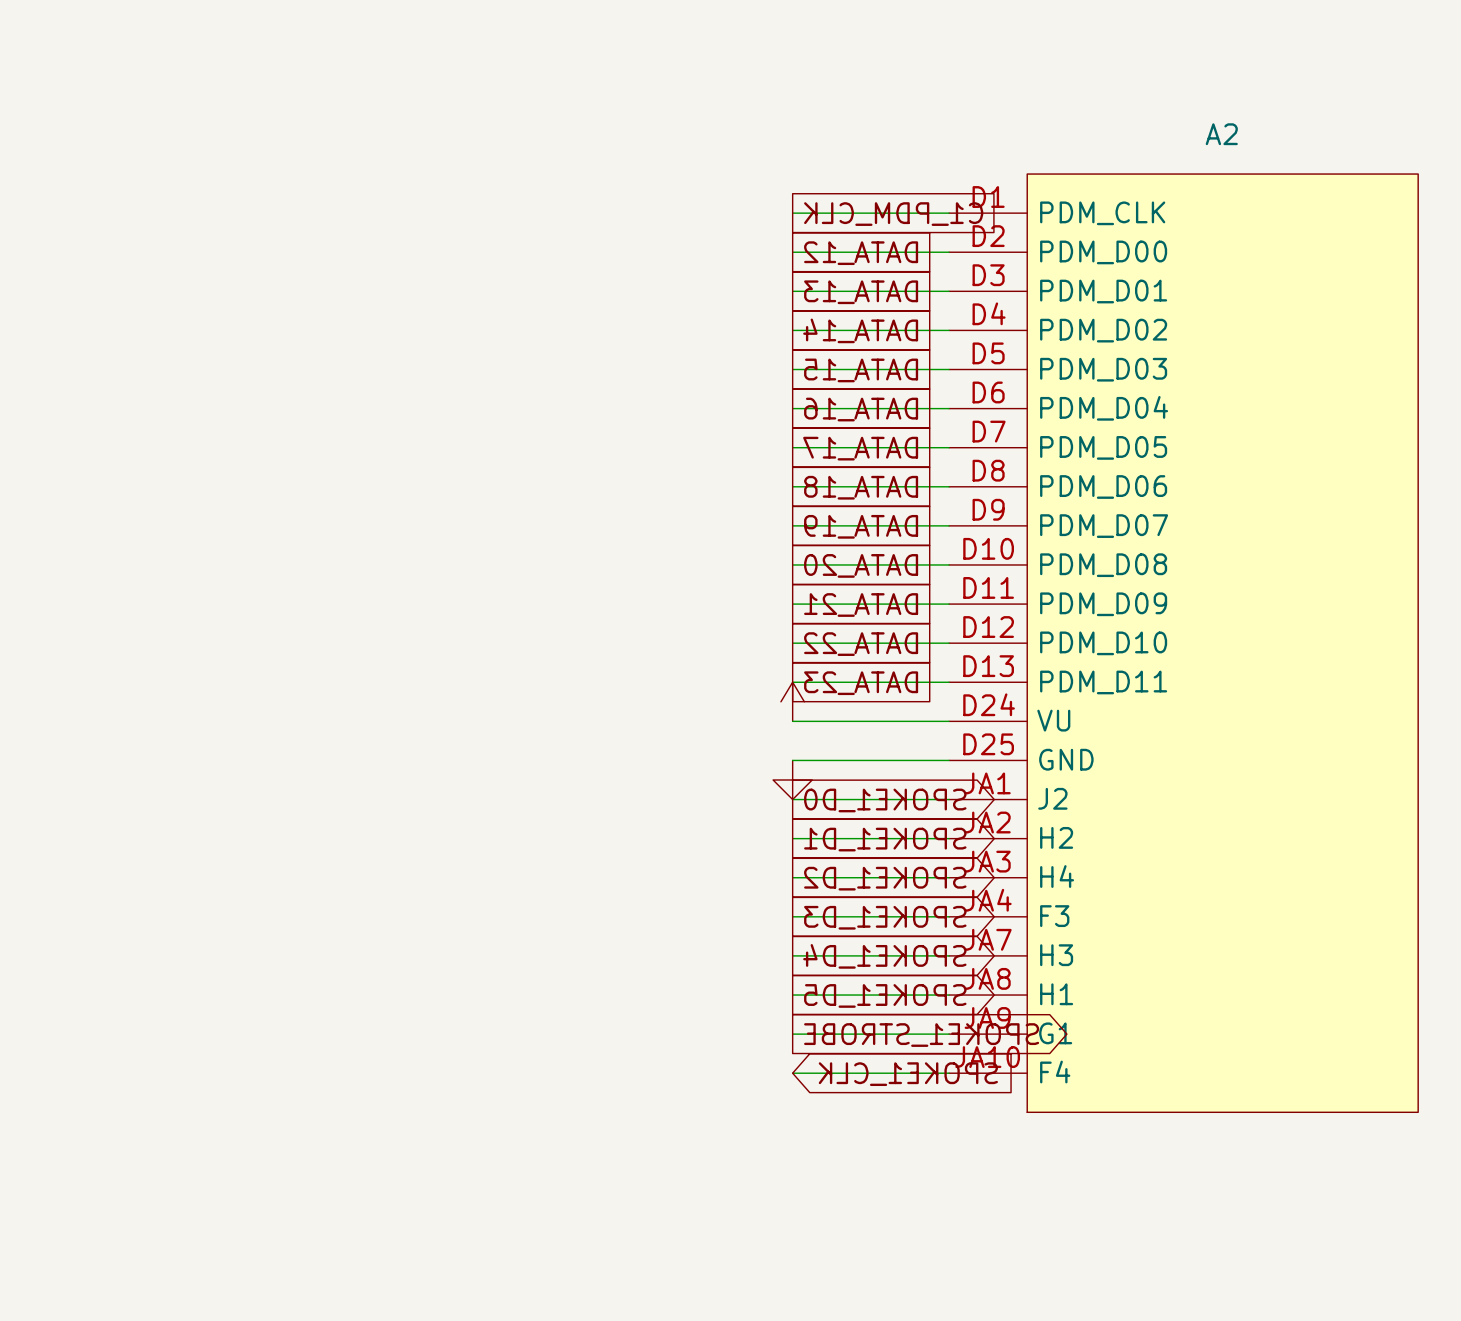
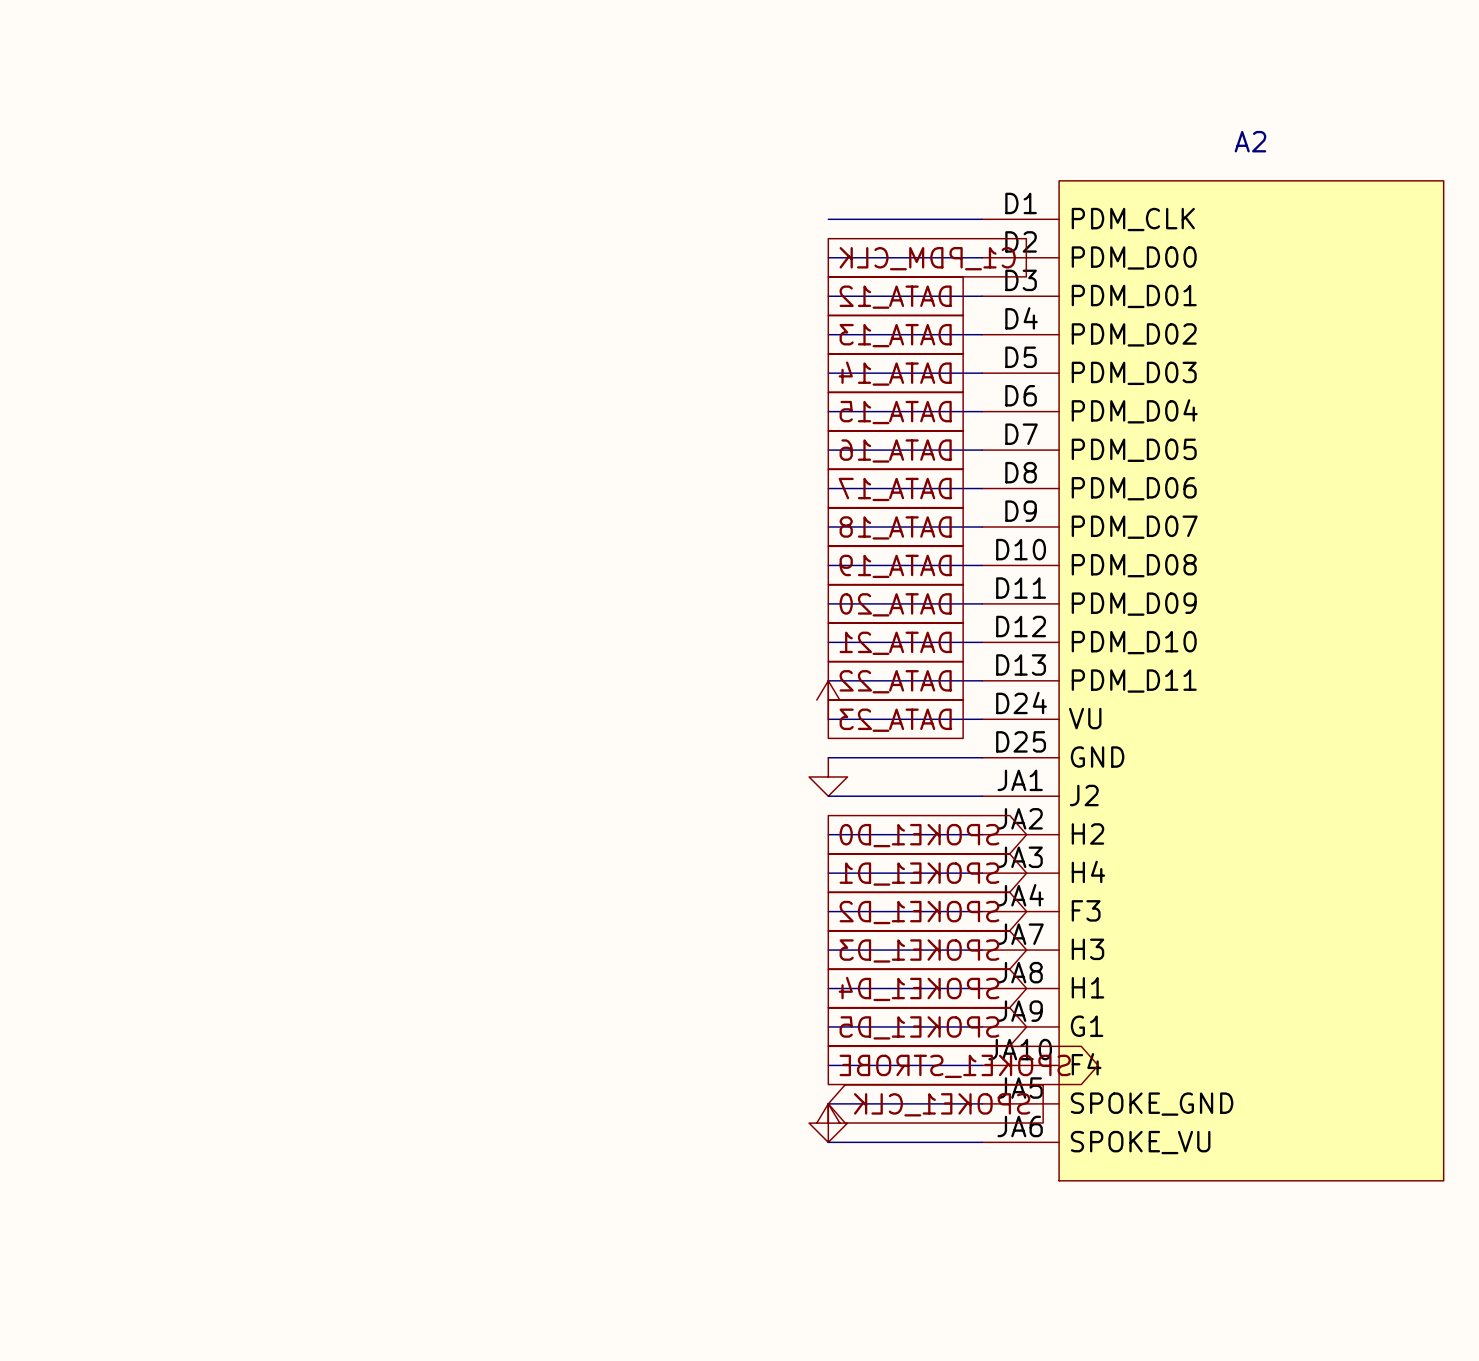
A2 name position: A2 (1221, 134) -> A2 (1250, 141)
wire: none -> (828, 219) (982, 219)
A2 symbol: [949, 174, 1419, 1113] -> [982, 180, 1444, 1181]
power symbol position: (792, 701) -> (828, 700)
power symbol position: (792, 780) -> (828, 776)
power symbol: none -> (828, 1123)
power symbol: none -> (828, 1123)
wire: none -> (828, 1142) (982, 1142)

